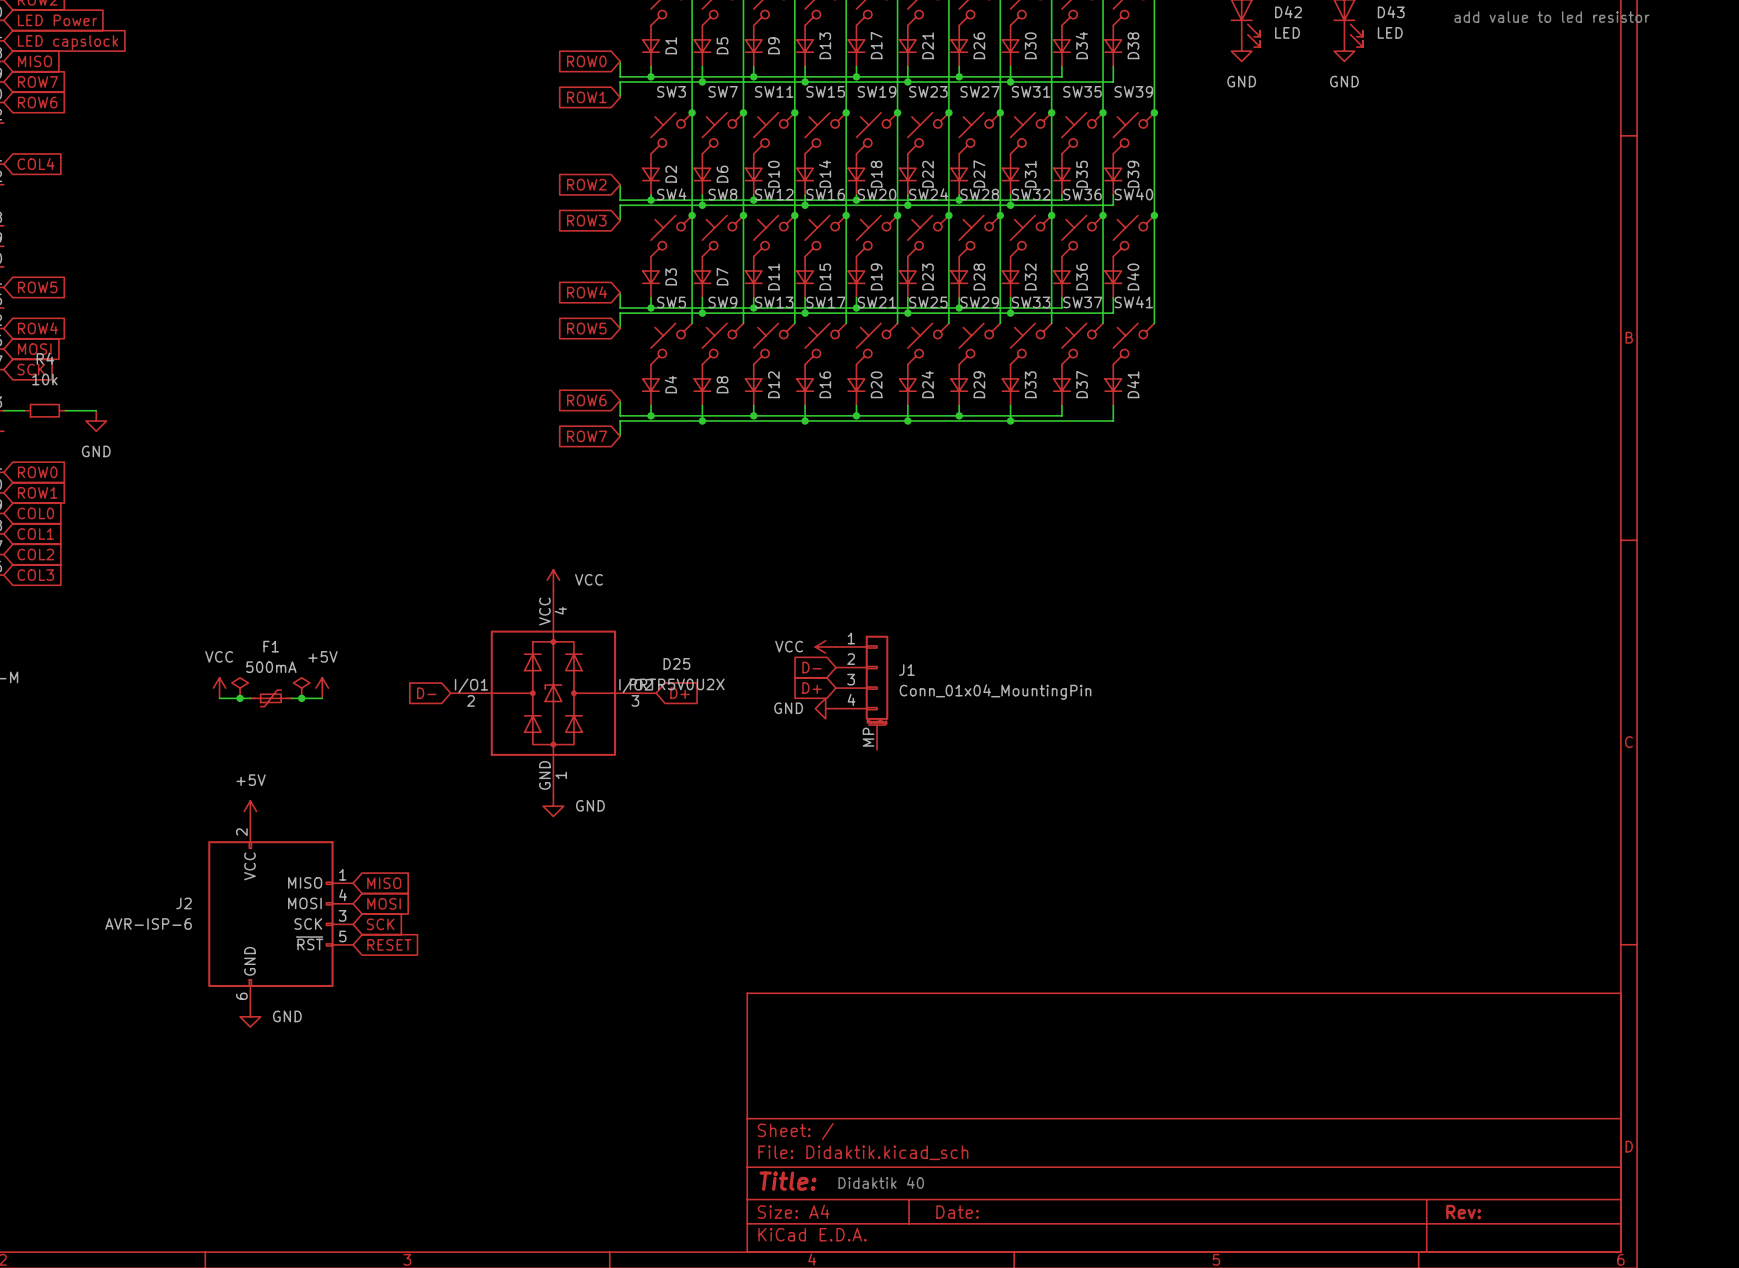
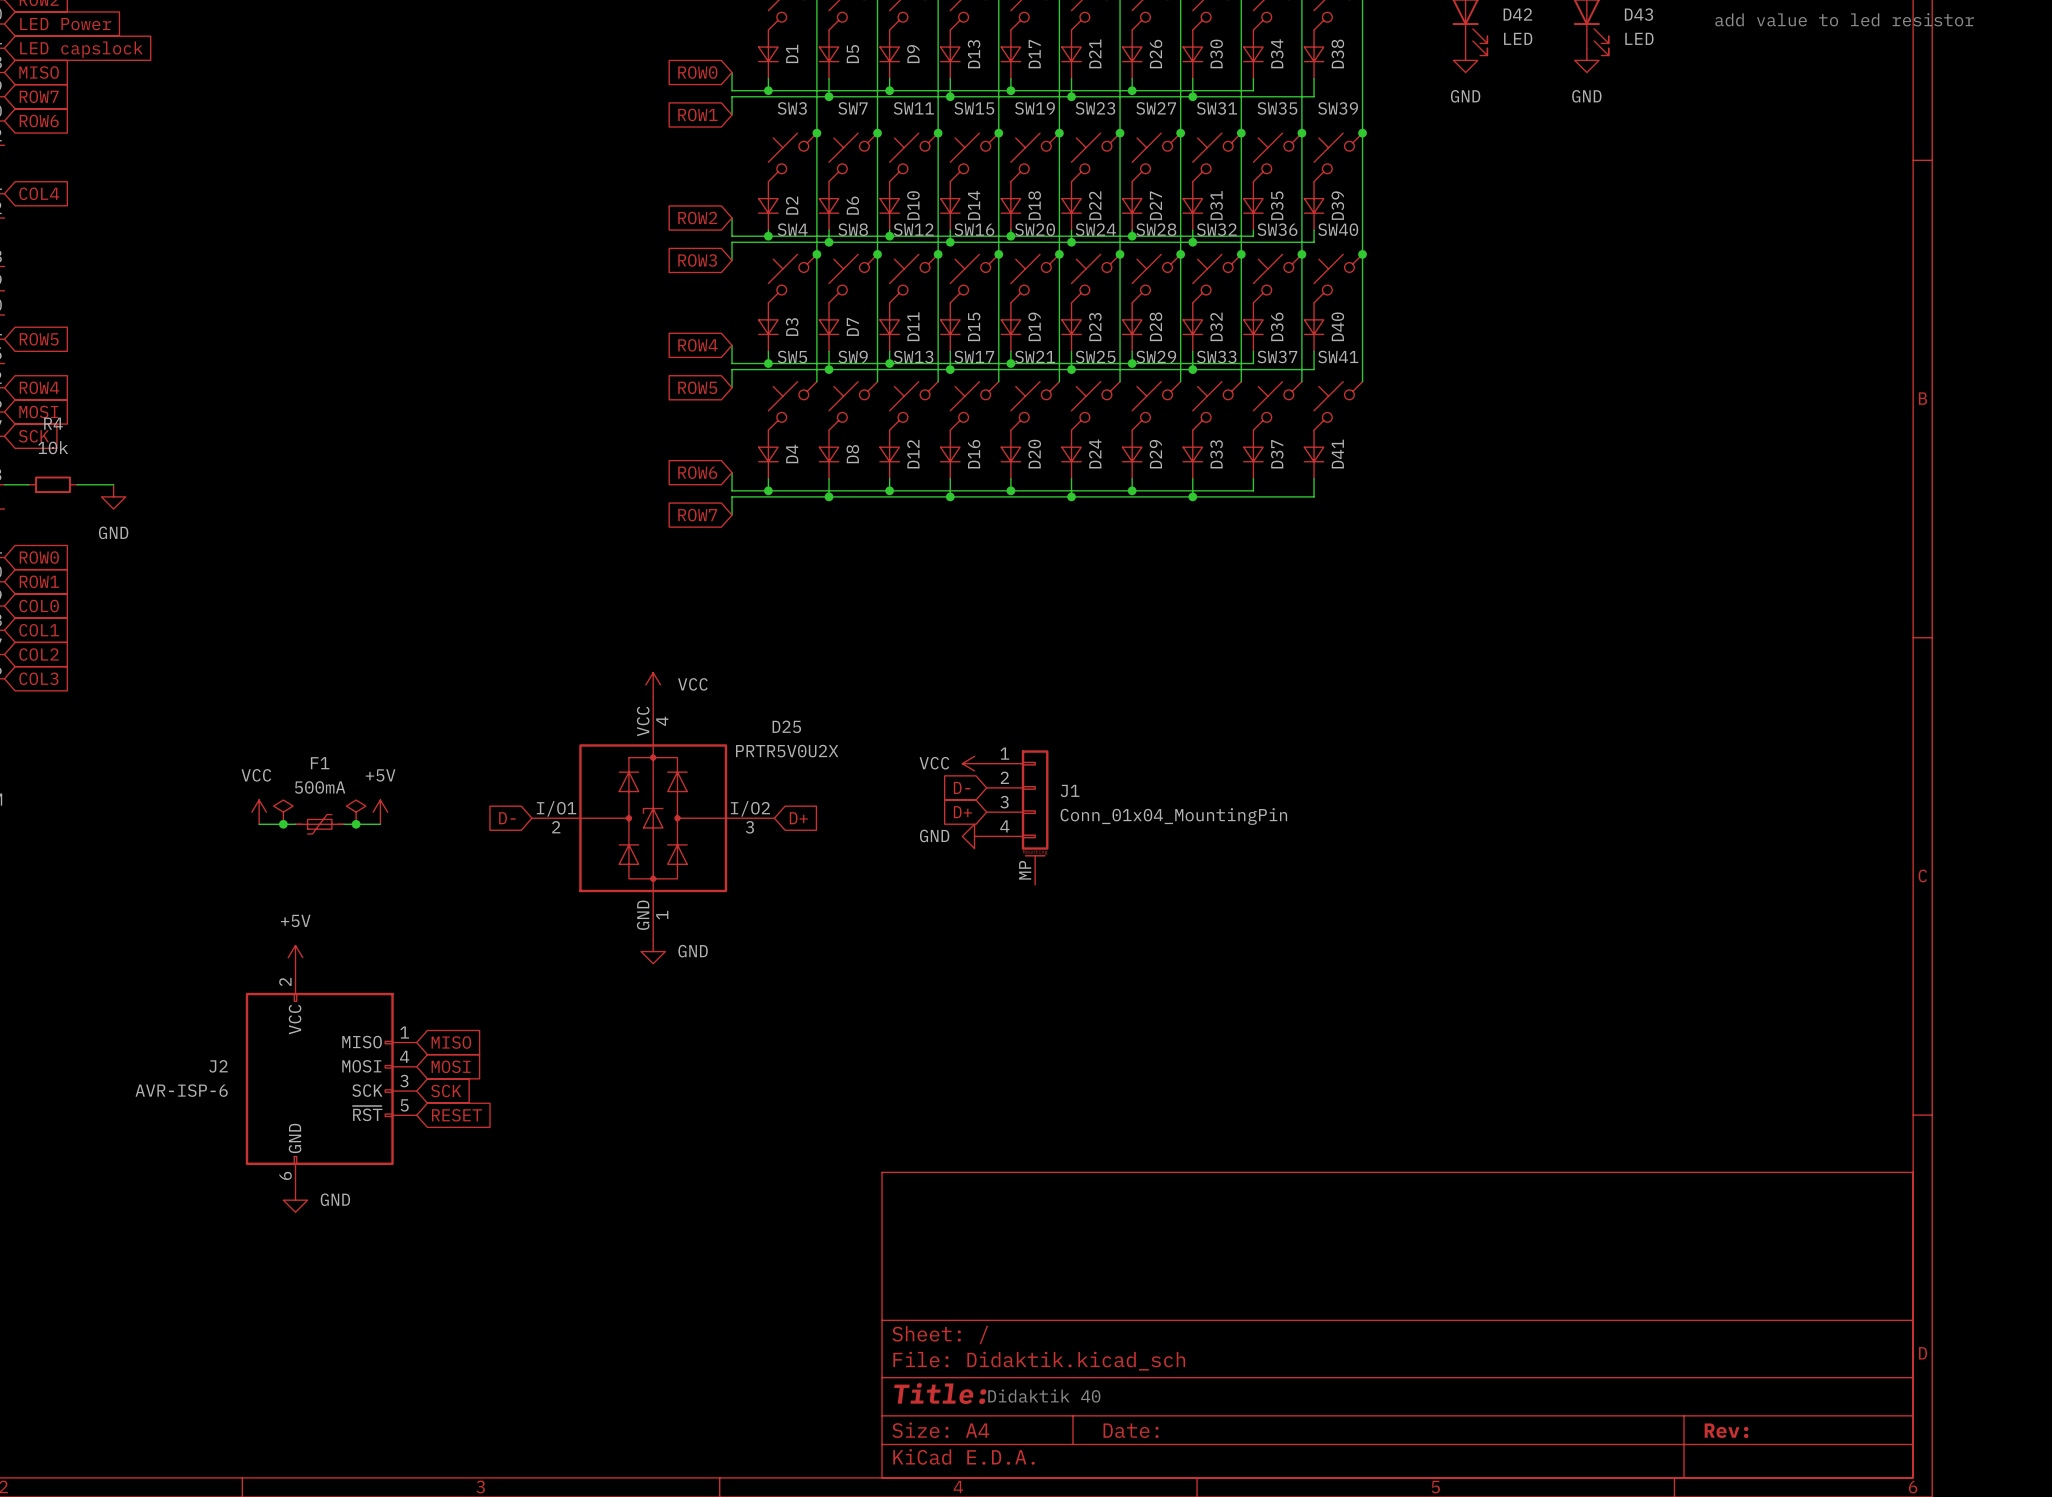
D25 name position: D25 (676, 663) -> D25 (786, 726)
D25 value position: PRTR5V0U2X (677, 684) -> PRTR5V0U2X (787, 751)

